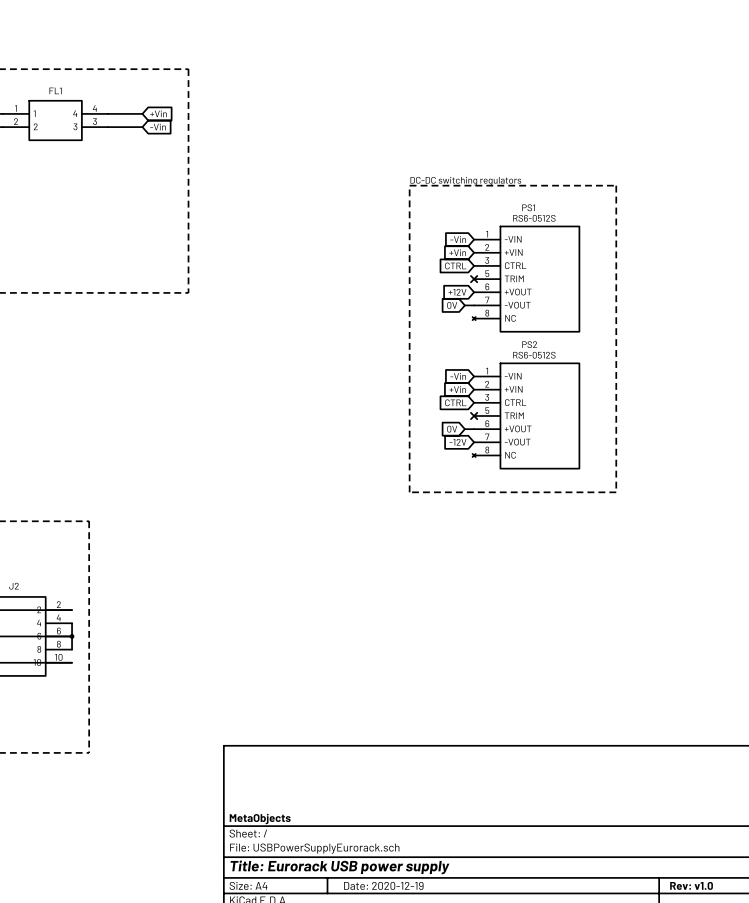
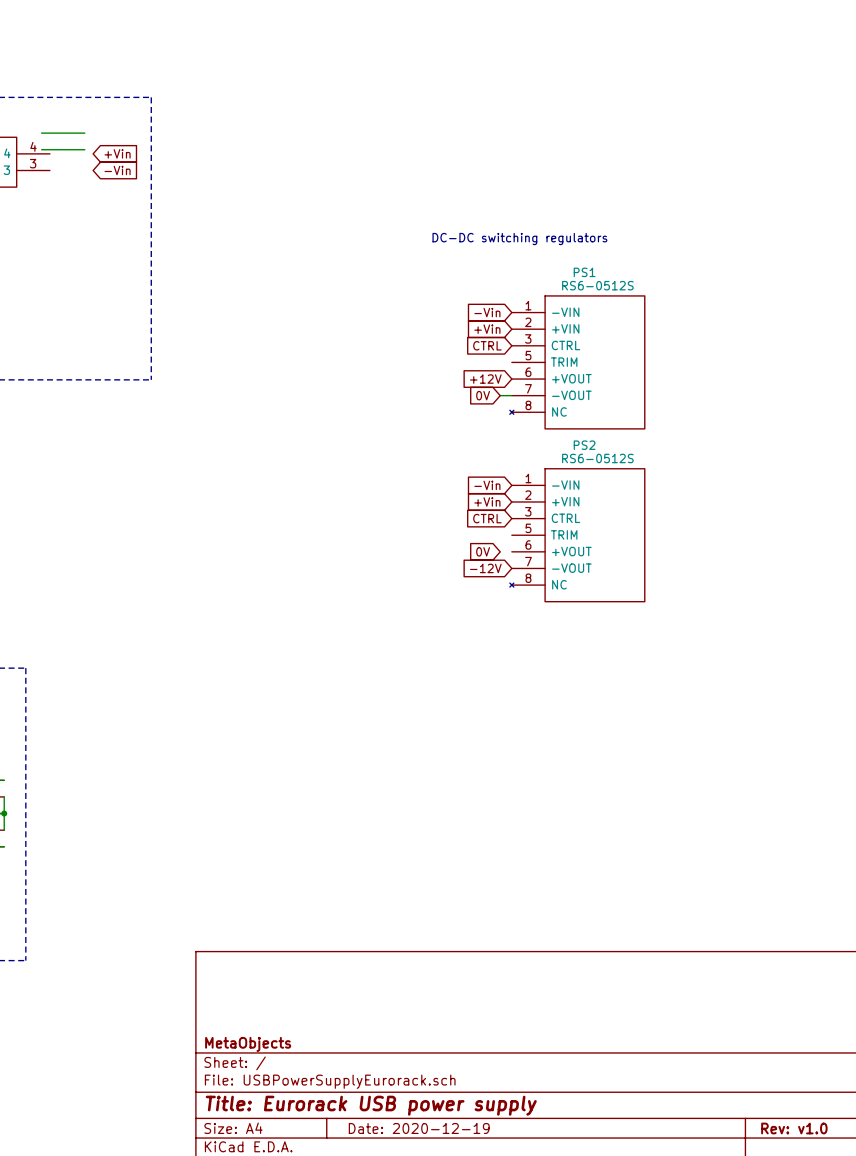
wire: (108, 113) (142, 113) -> (41, 133) (84, 133)
wire: (108, 127) (142, 127) -> (41, 149) (84, 149)
line: (409, 185) (616, 185) (616, 492) (409, 492) (409, 185) -> none
no-connect mark: (474, 279) -> none
no-connect mark: (474, 415) -> none
wire: (464, 429) (474, 429) -> none

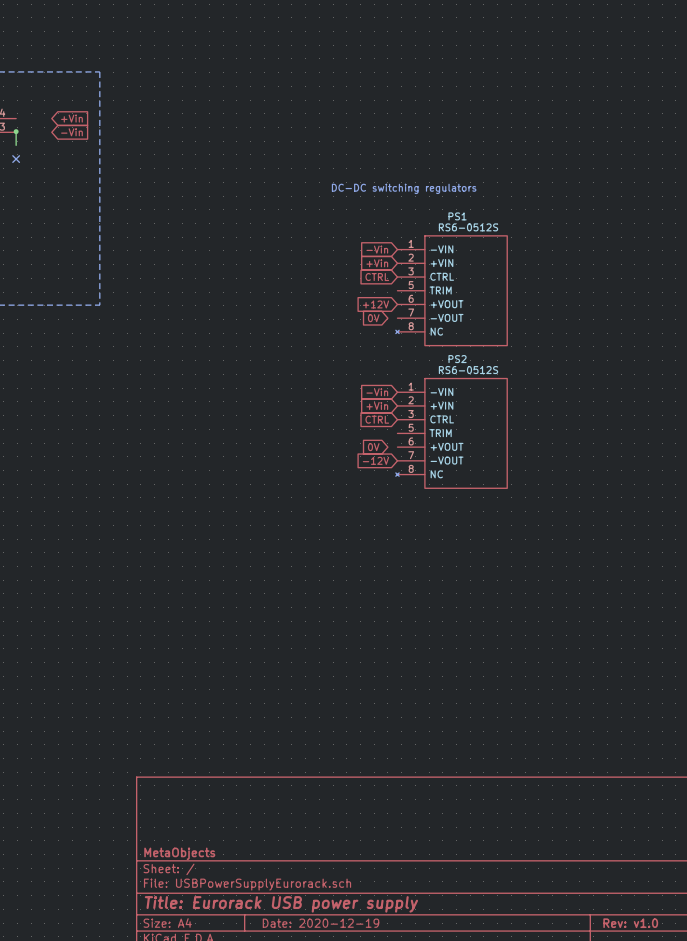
wire: (41, 133) (84, 133) -> none
wire: (41, 149) (84, 149) -> none
wire: none -> (16, 131) (16, 145)
junction: none -> (16, 131)
no-connect mark: none -> (16, 159)
wire: (500, 395) (511, 395) -> none

